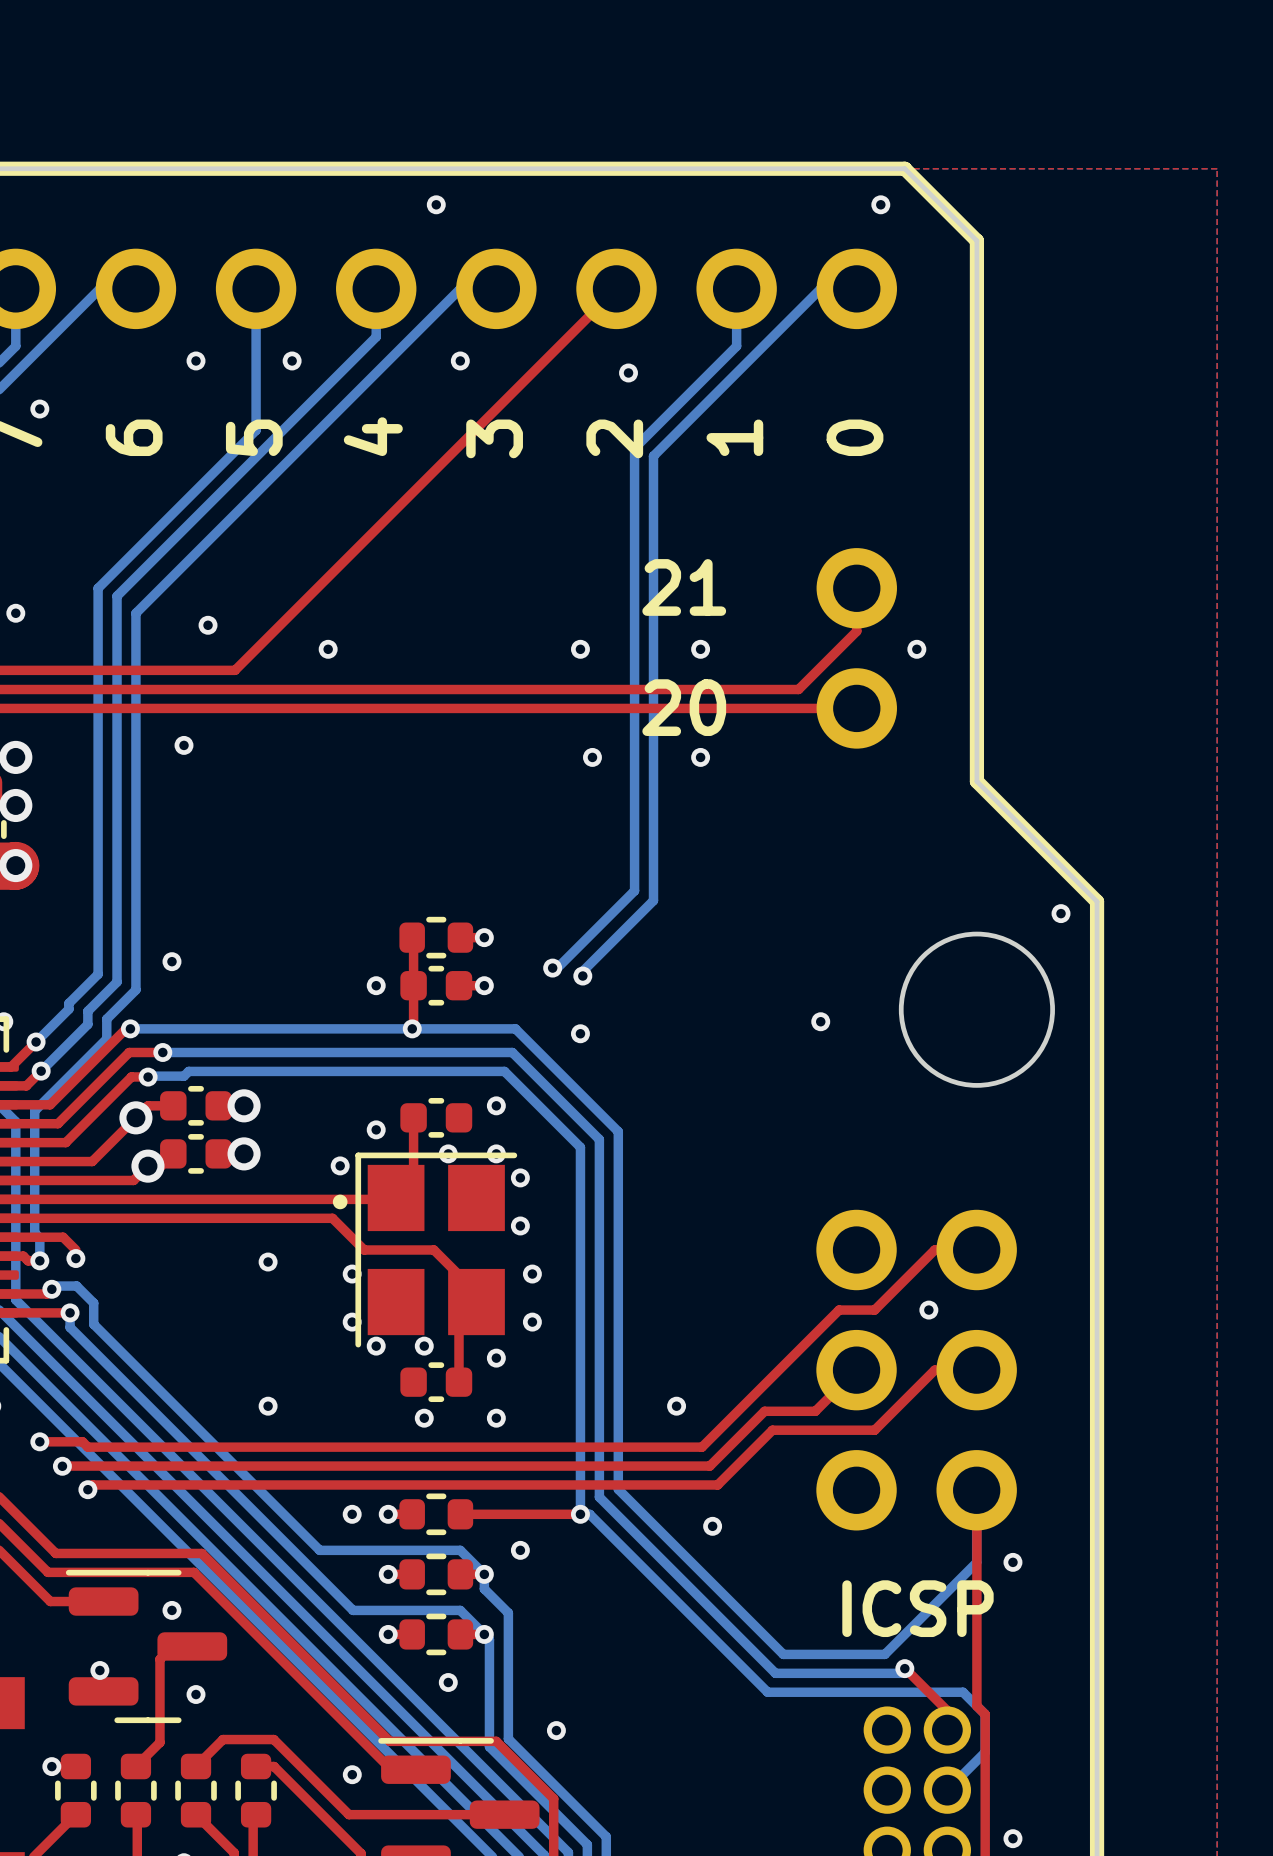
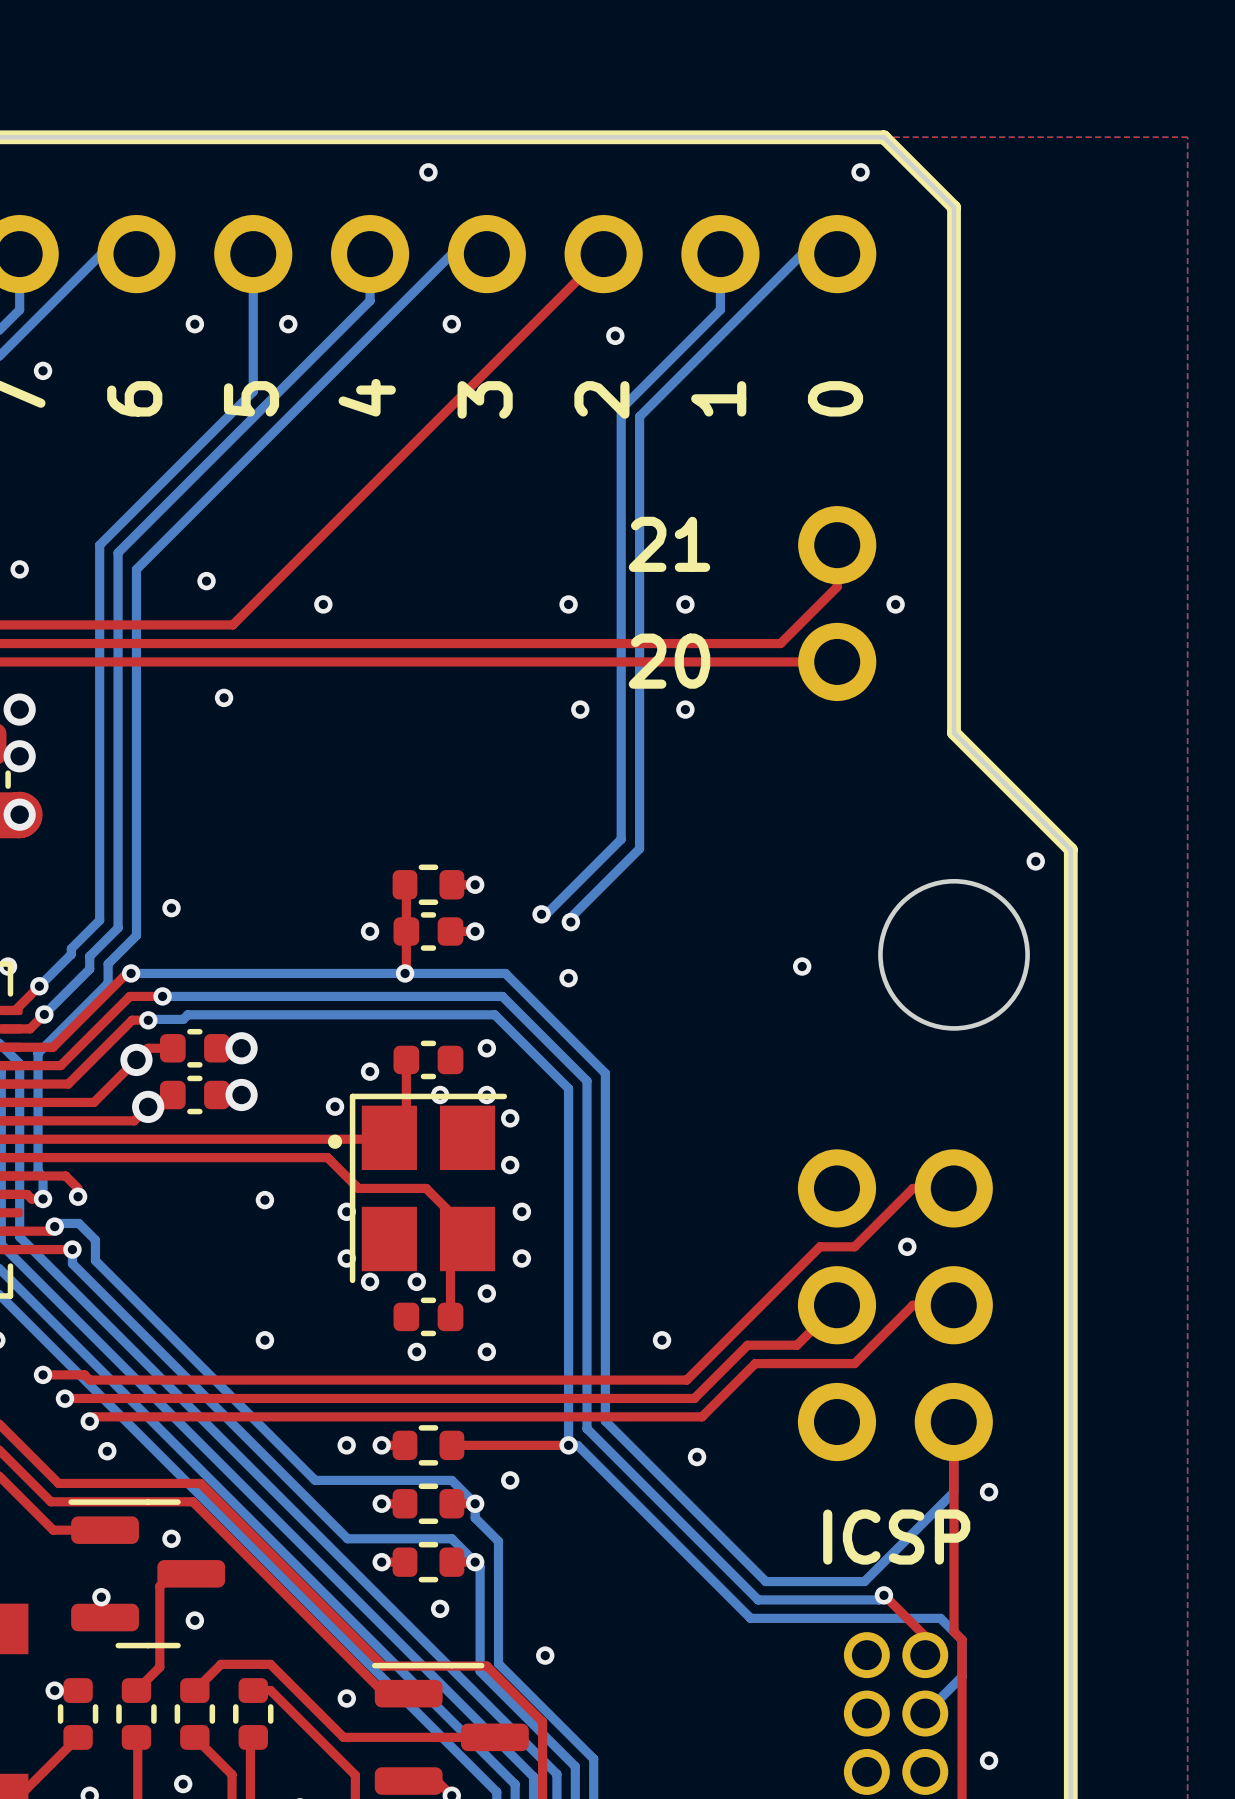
via position: (184, 745) -> (224, 697)
via: none -> (107, 1451)

